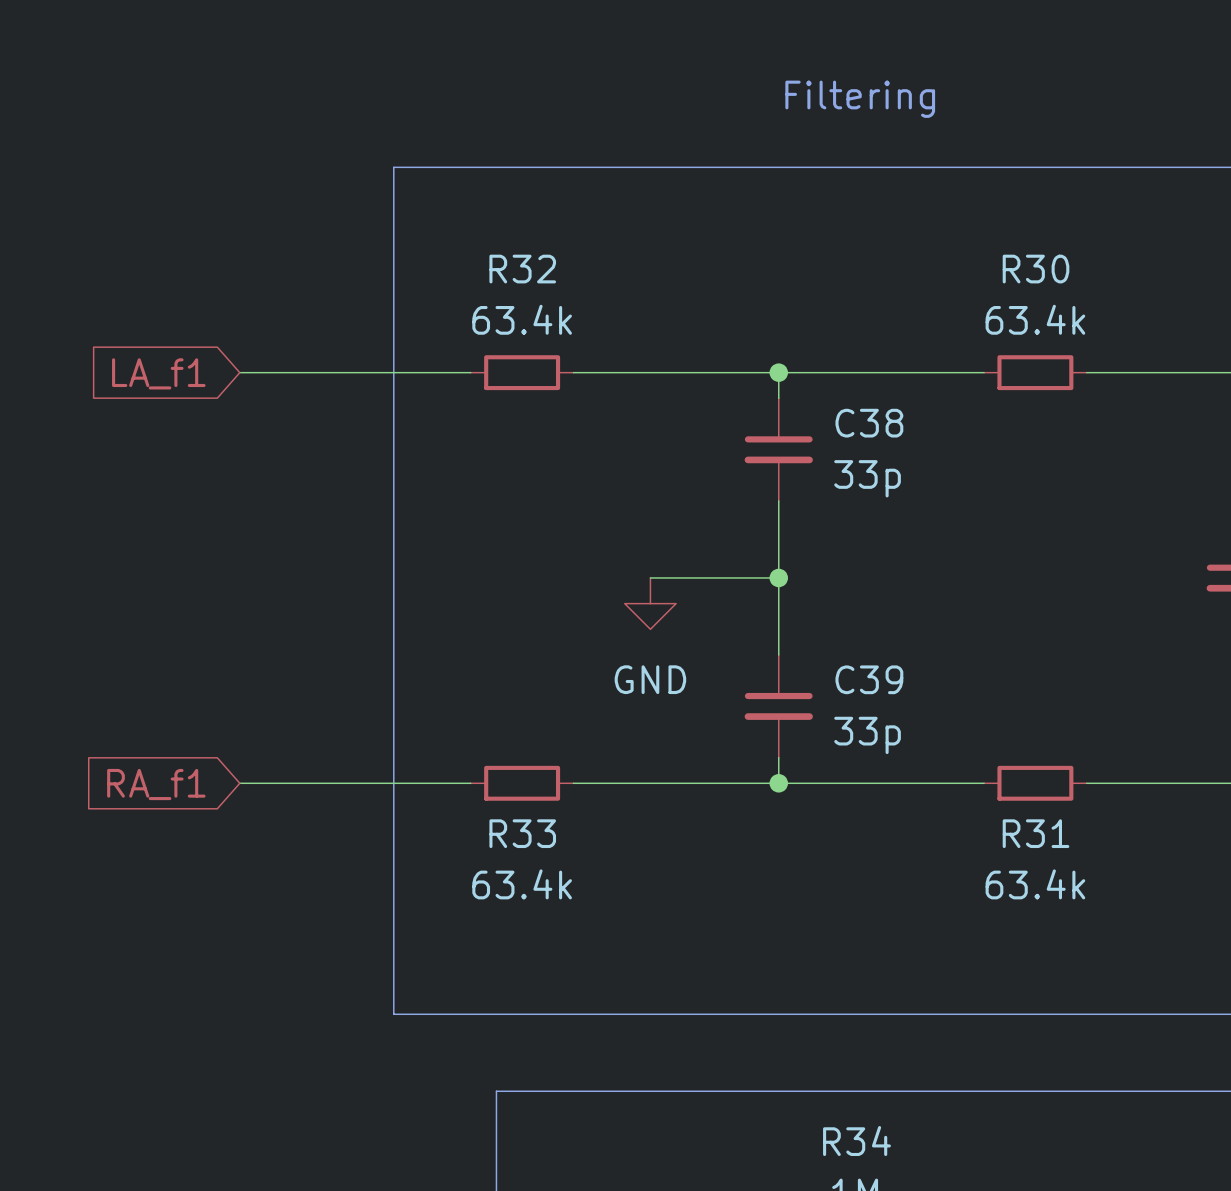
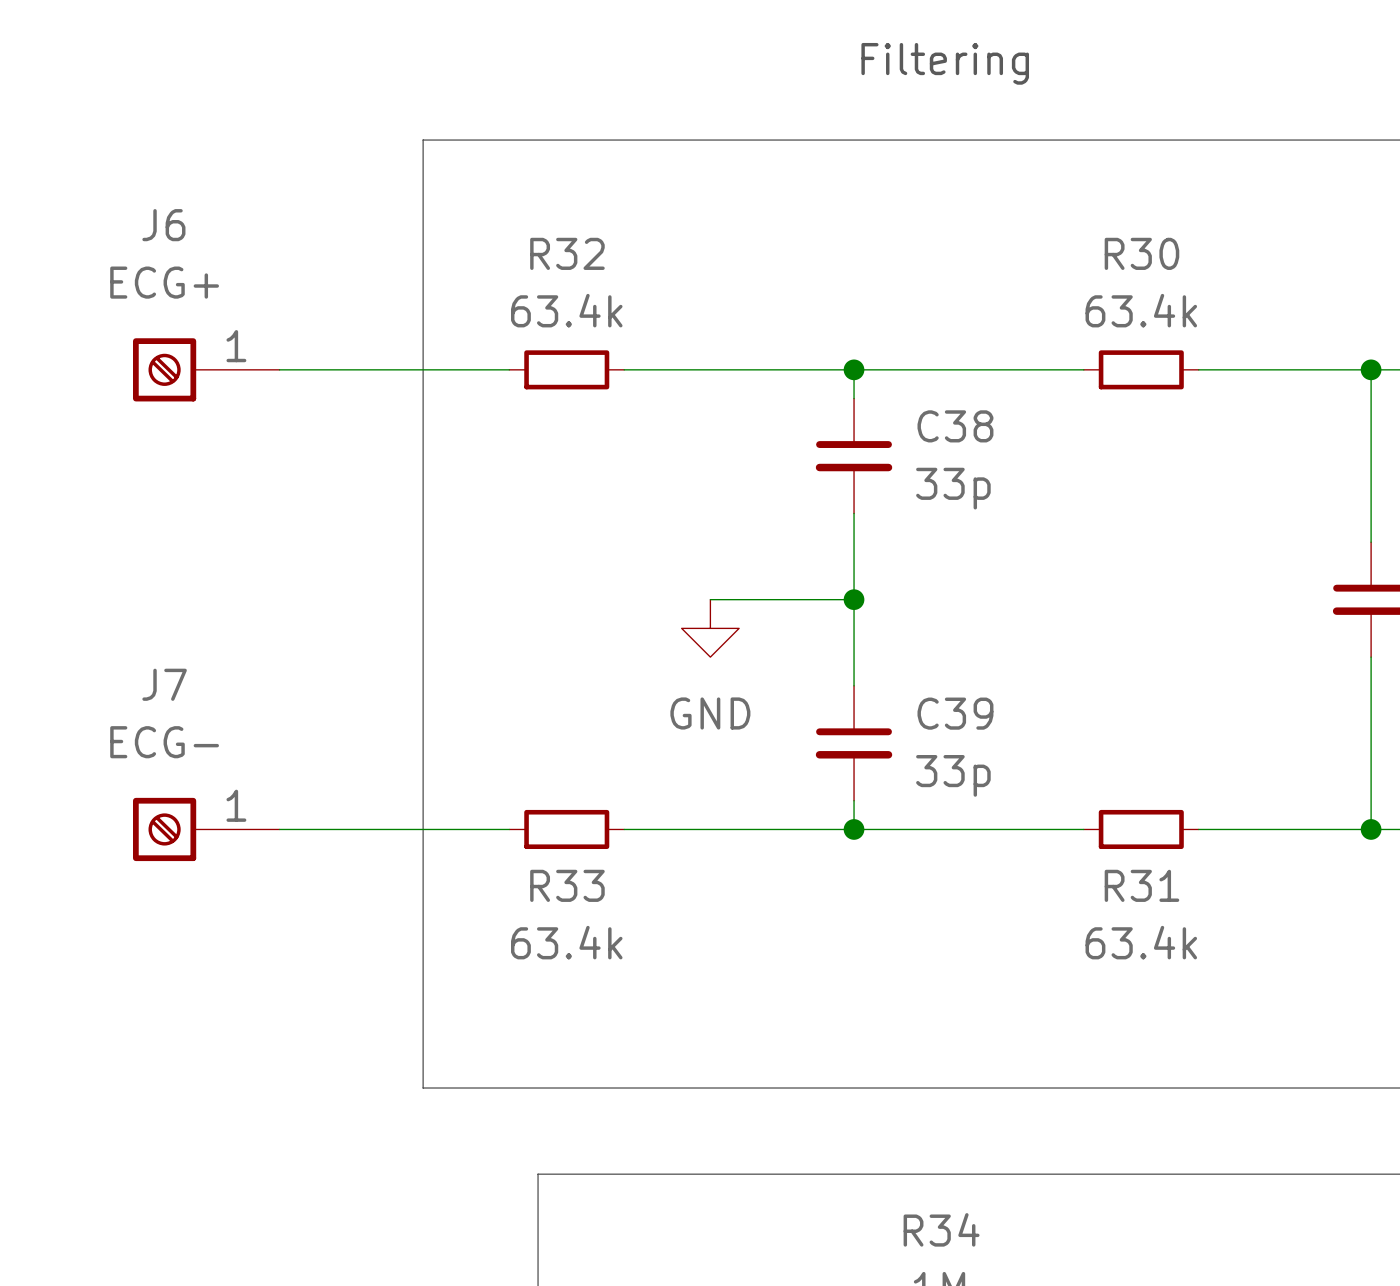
J6: none -> ECG+ (206, 369)
global label: LA_f1 (158, 373) -> none
J7: none -> ECG- (206, 829)
global label: RA_f1 (156, 784) -> none

